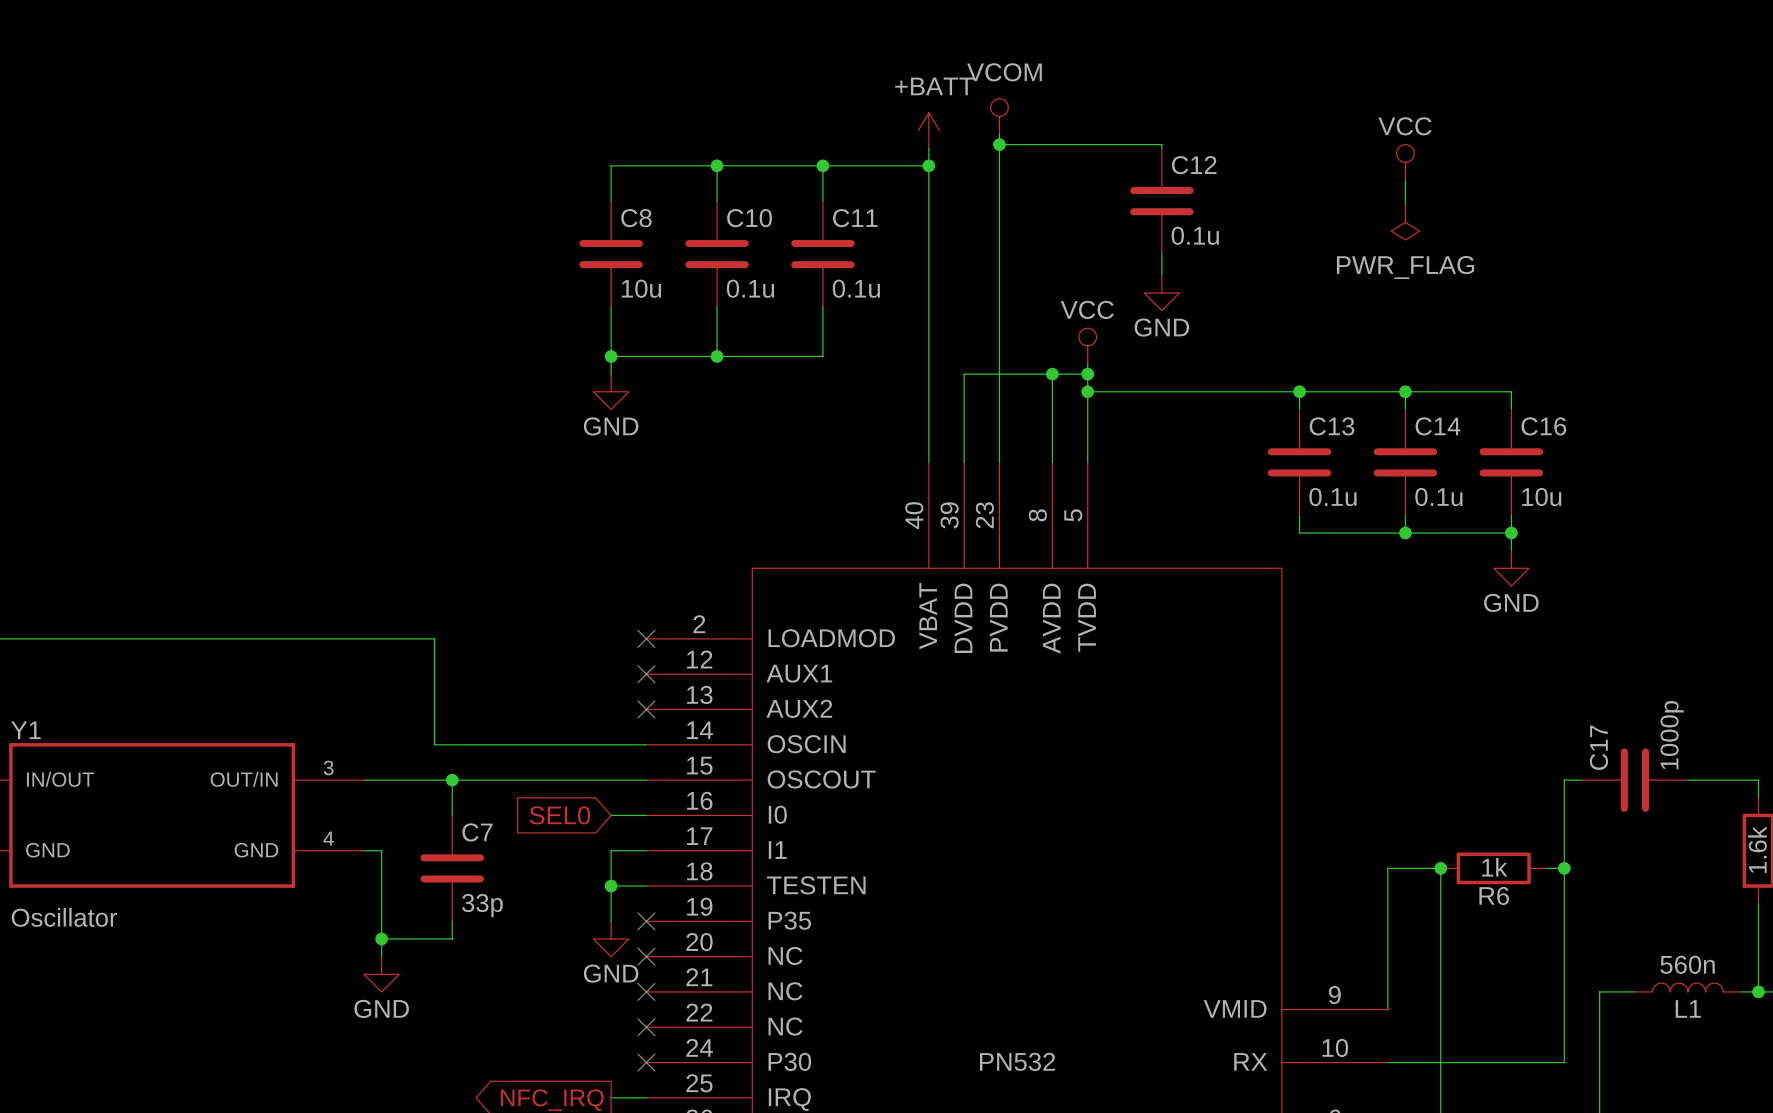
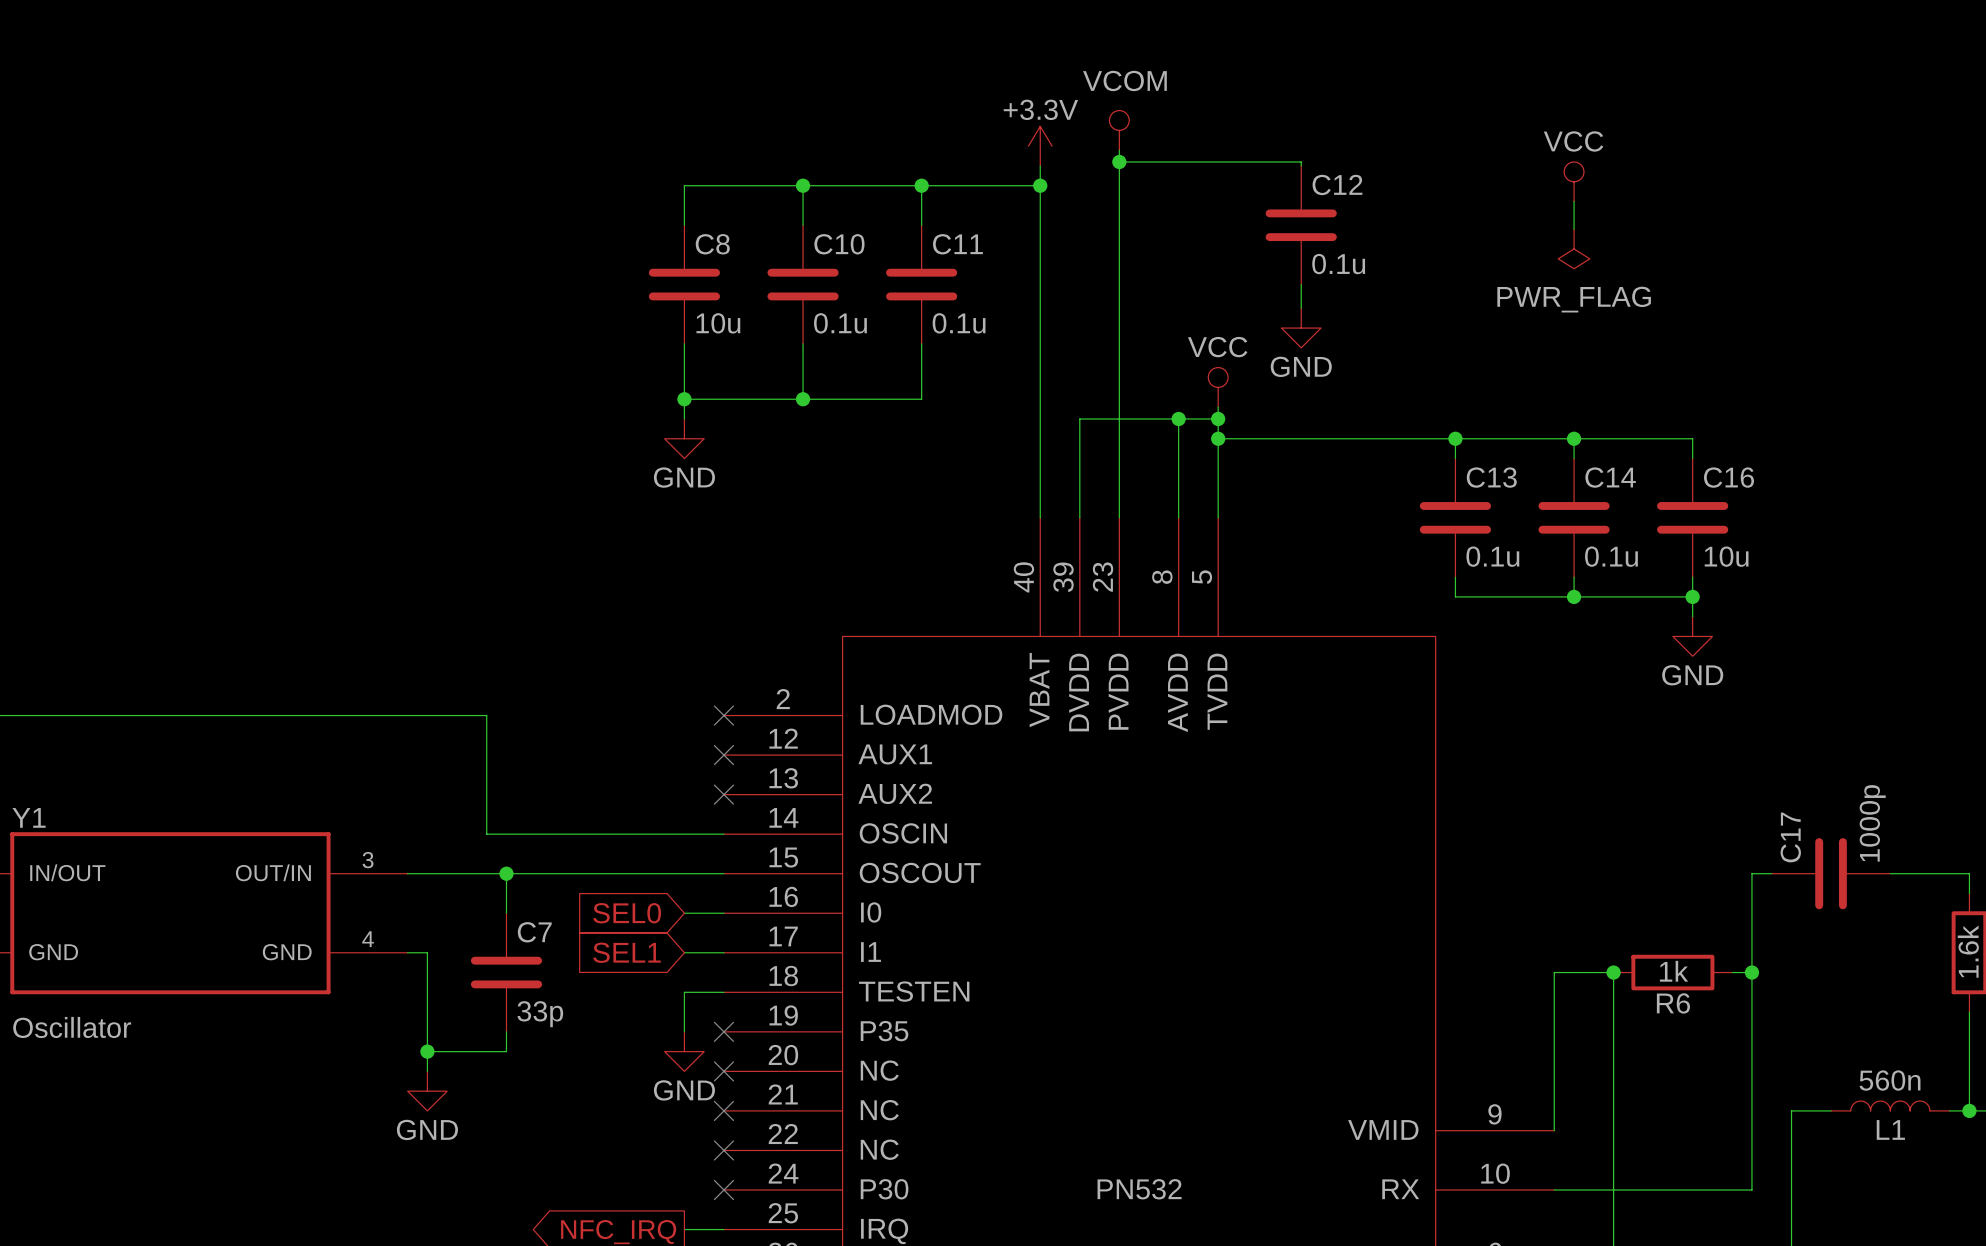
power symbol: +BATT (928, 130) -> +3.3V (1040, 146)
global label: none -> SEL1 (626, 952)
wire: (611, 850) (611, 886) -> none
junction: (611, 886) -> none

